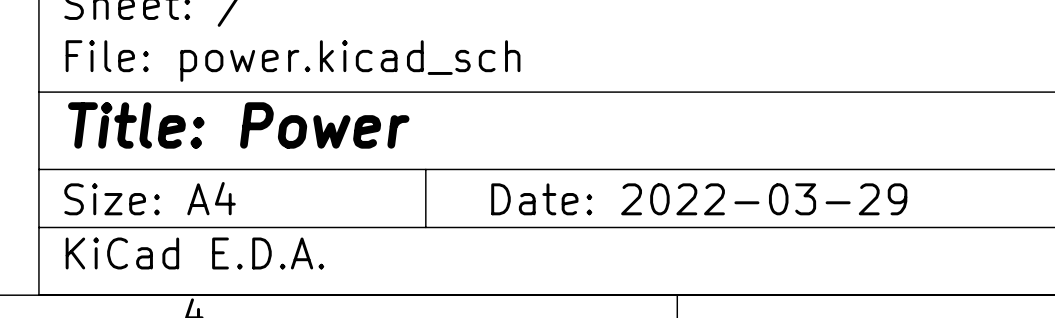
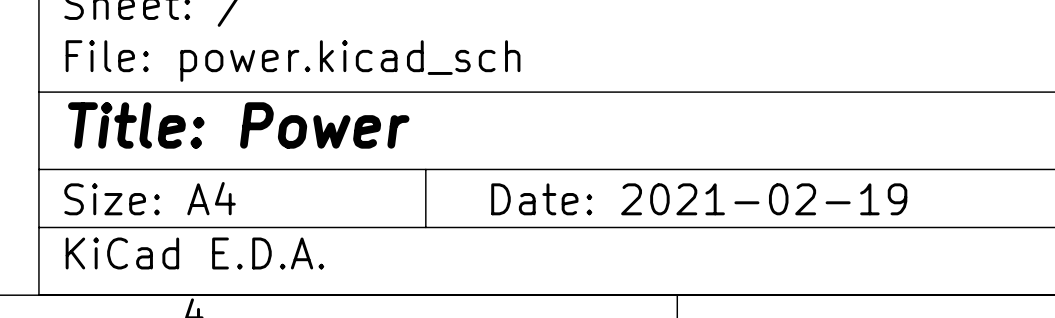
title block: Date: 2022-03-29 (699, 199) -> Date: 2021-02-19 (699, 199)

